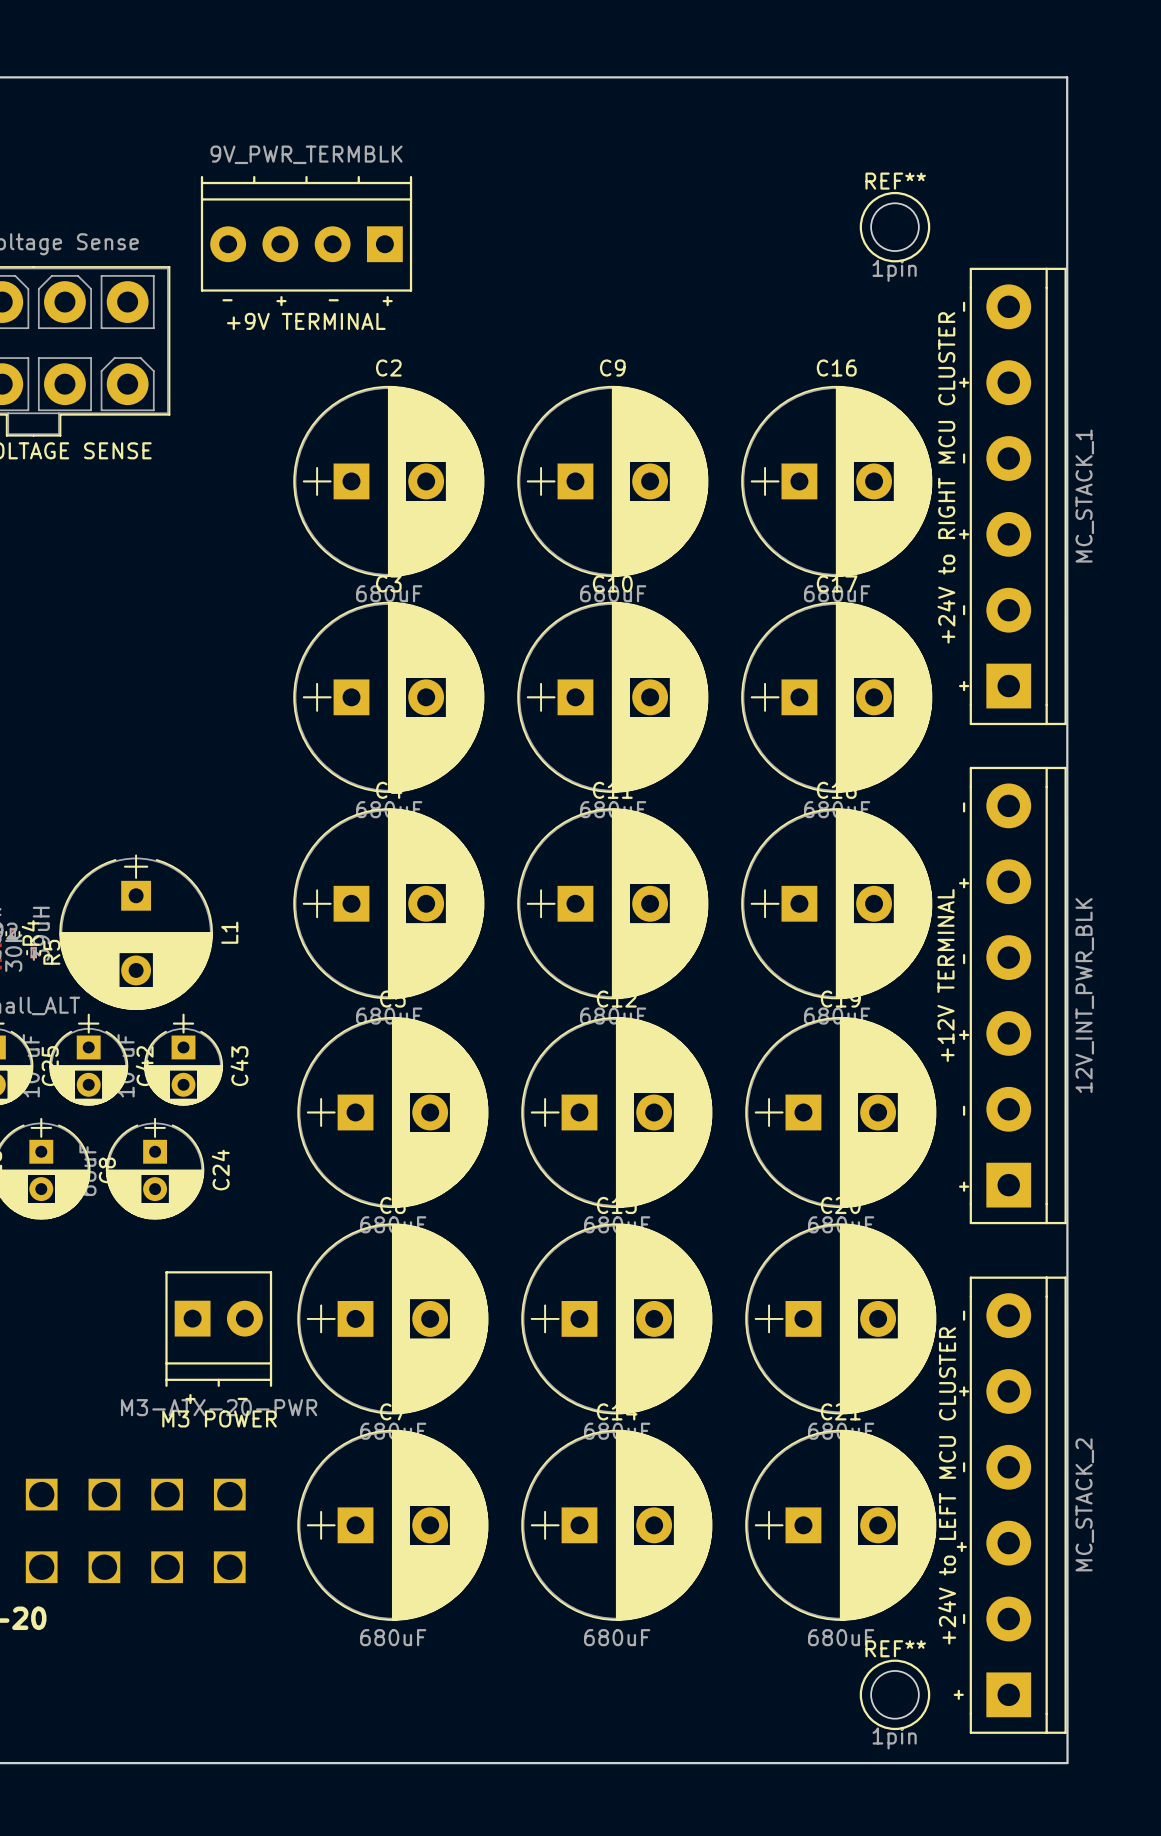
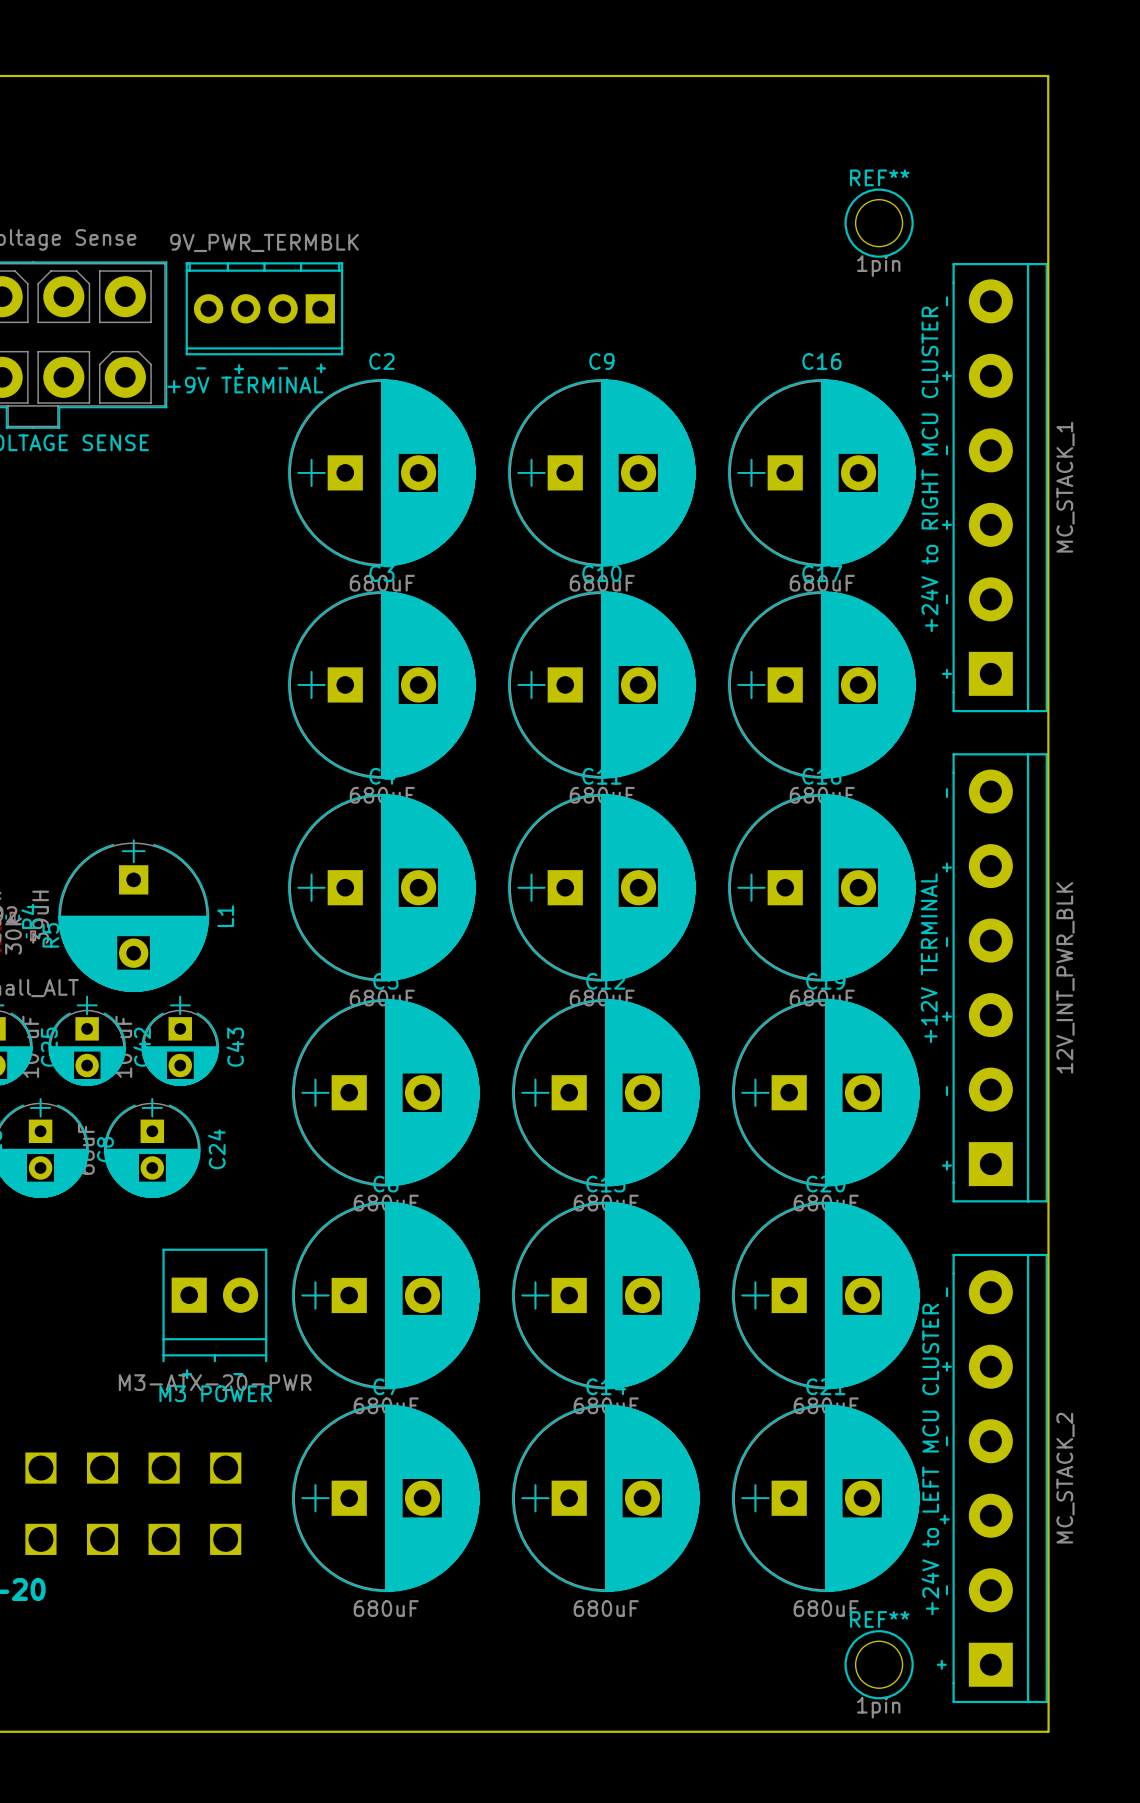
+9V TERMINAL footprint: [200, 175, 413, 292] -> [185, 262, 344, 356]
text: - (227, 300) -> none
text: - (333, 300) -> none
text: + (281, 301) -> none
text: + (387, 301) -> none
text: none -> - (201, 368)
text: none -> - (283, 368)
text: none -> + (239, 369)
text: none -> + (321, 368)

